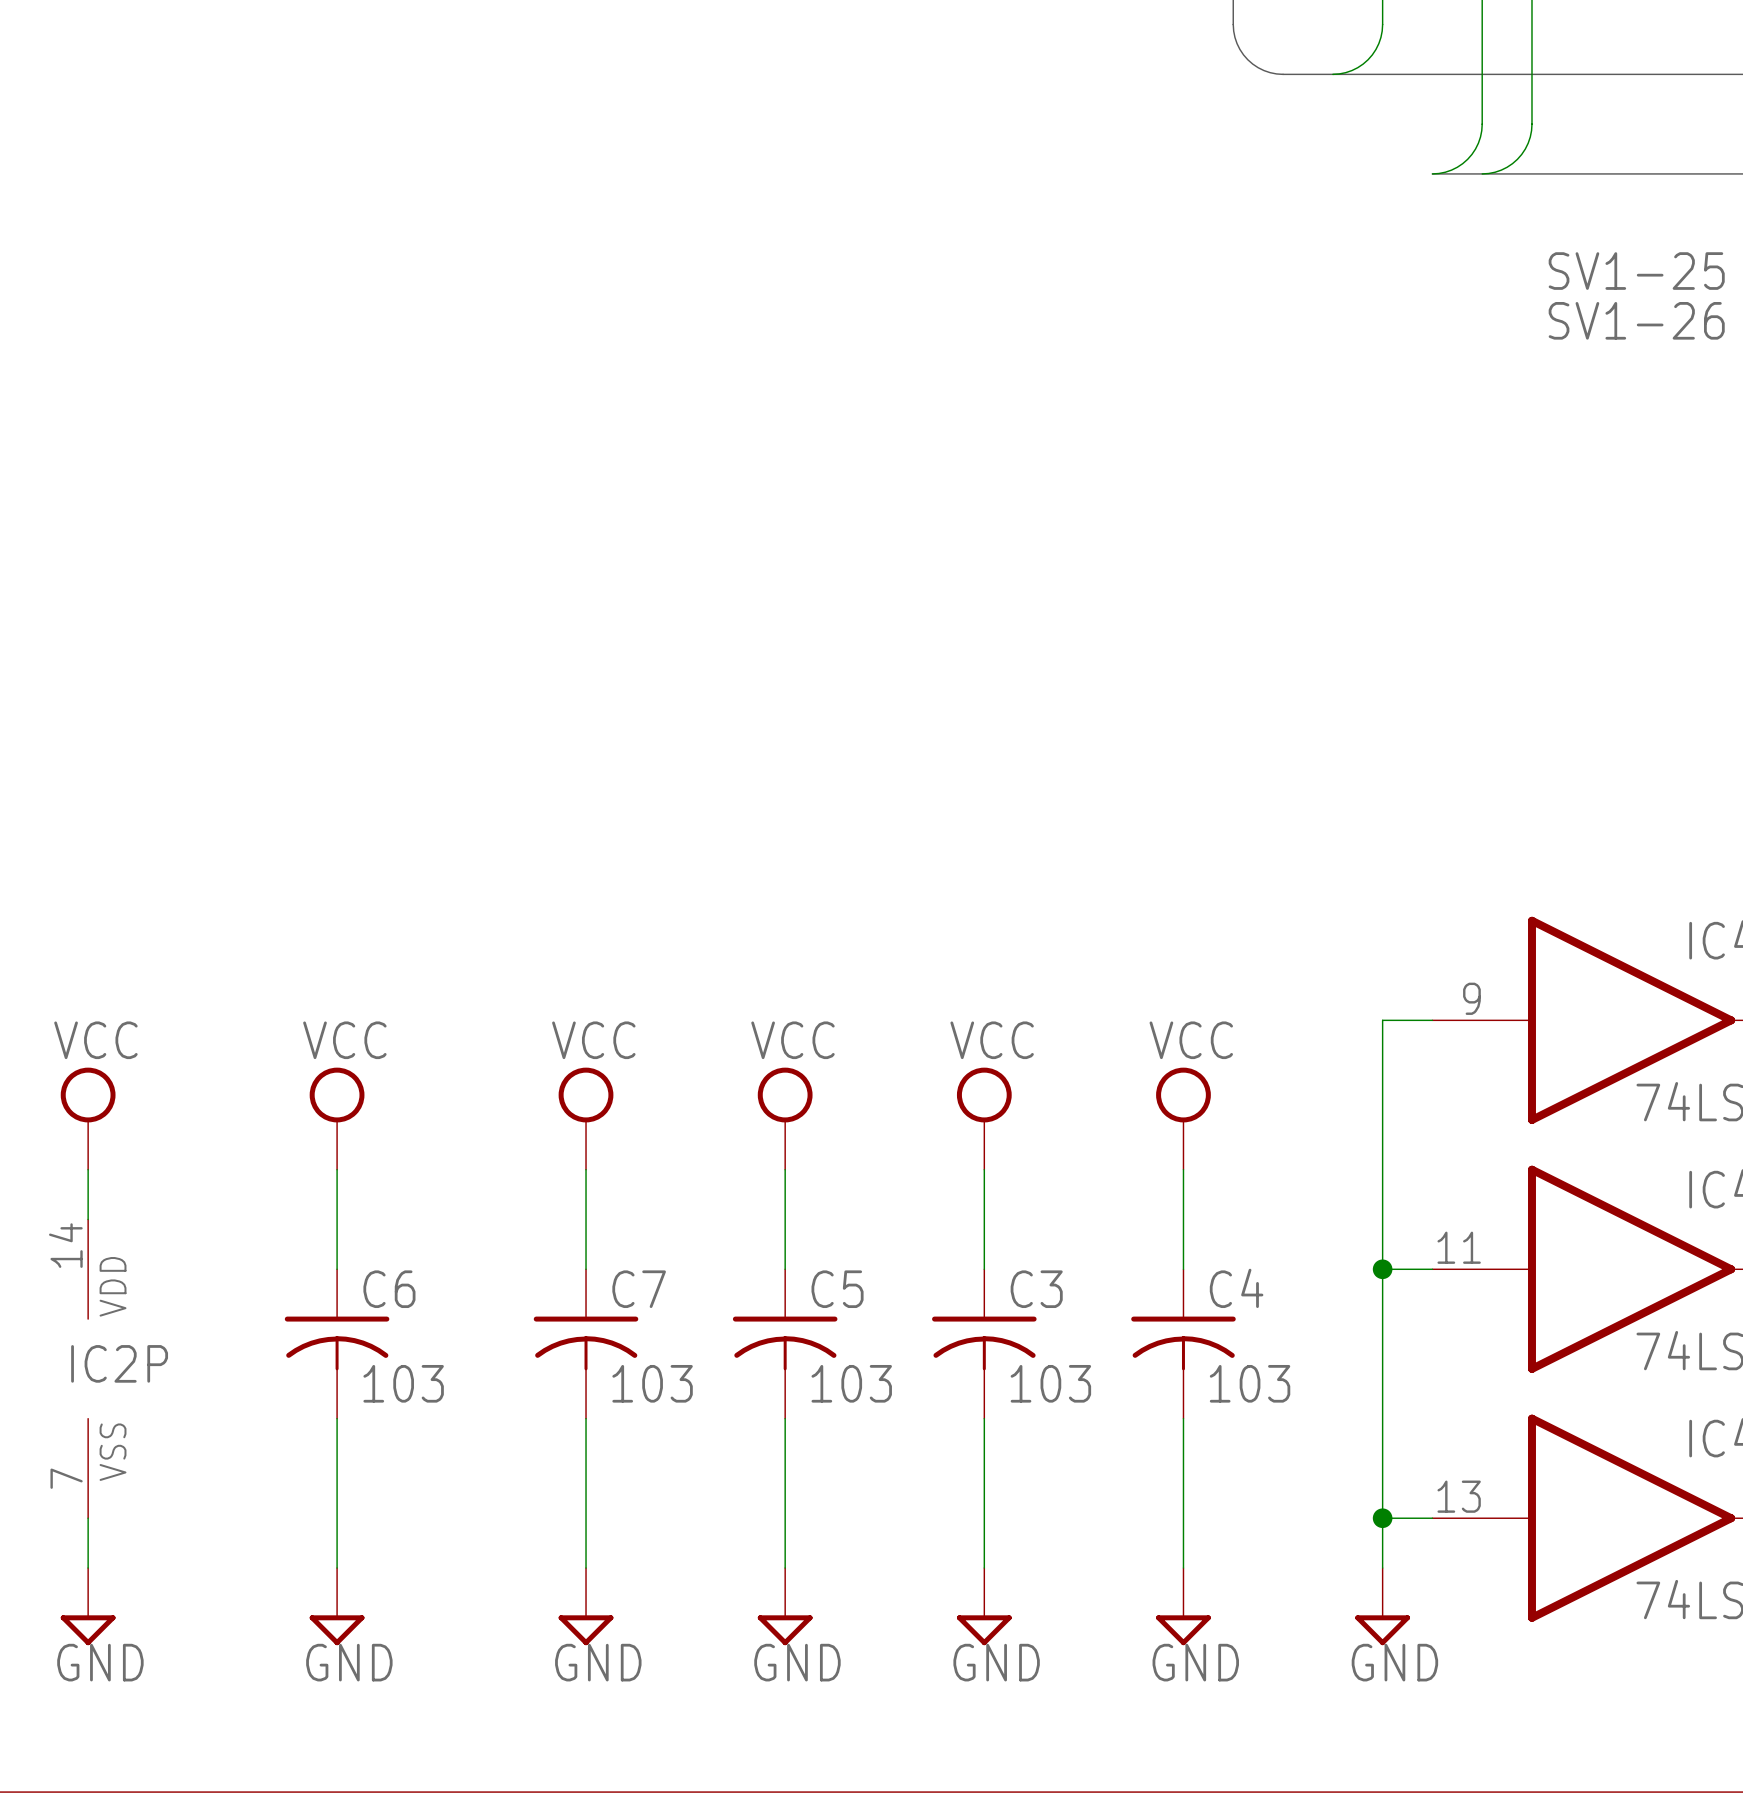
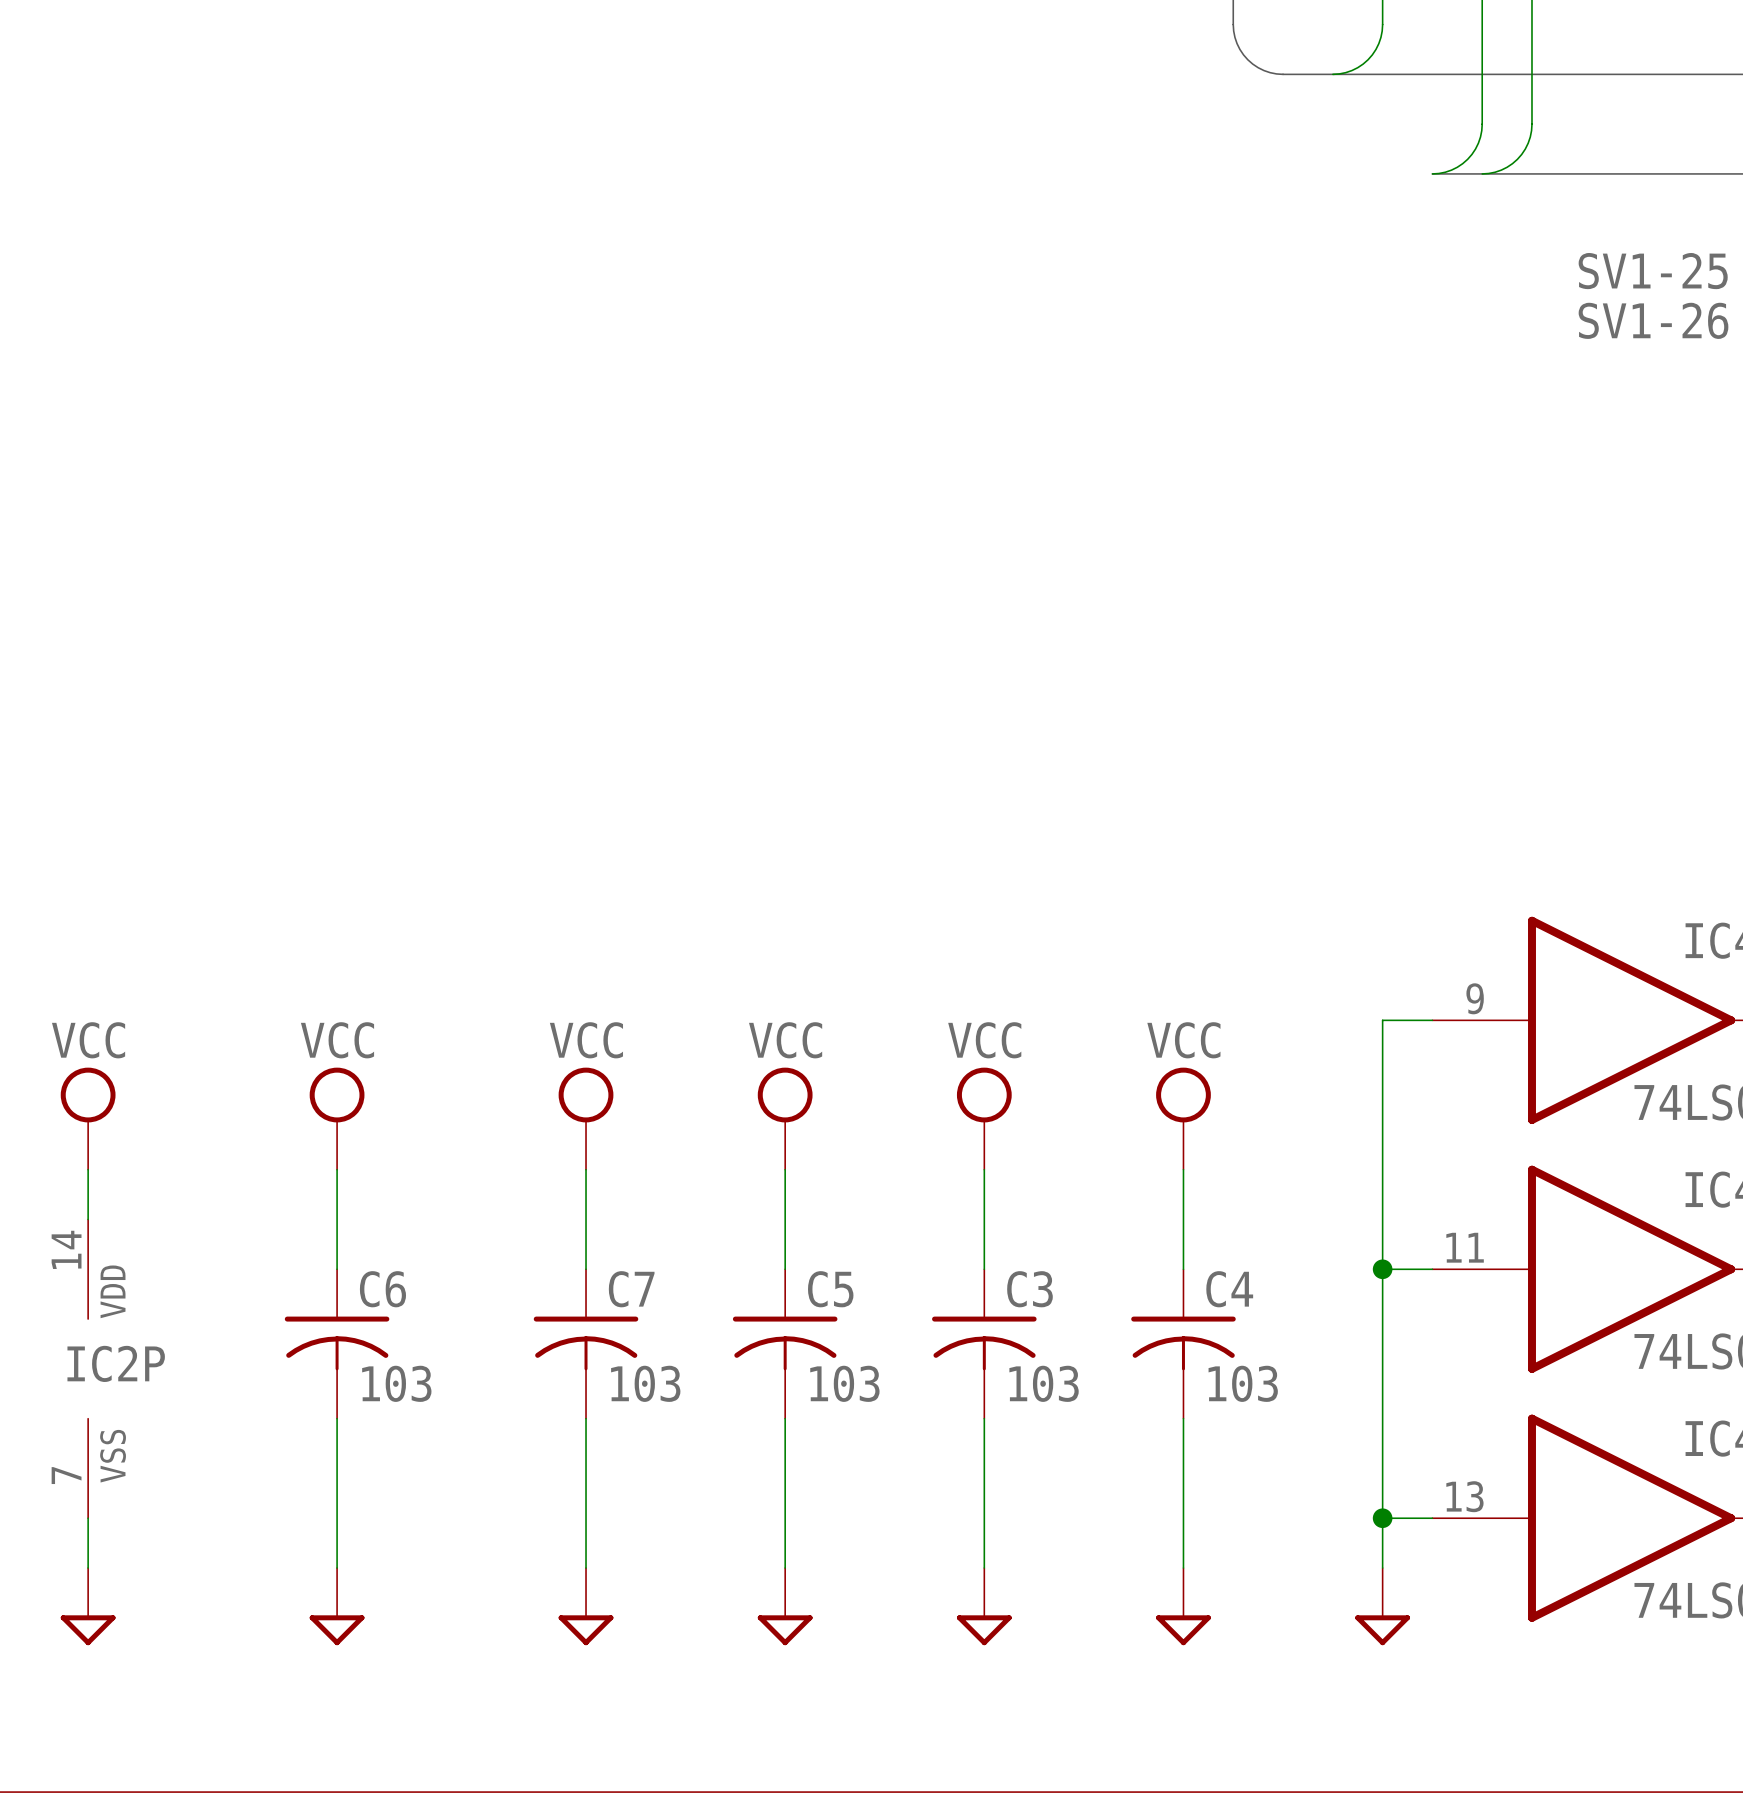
power symbol text: GND (100, 1662) -> none
power symbol text: GND (349, 1662) -> none
power symbol text: GND (598, 1662) -> none
power symbol text: GND (797, 1662) -> none
power symbol text: GND (996, 1662) -> none
power symbol text: GND (1195, 1662) -> none
power symbol text: GND (1394, 1662) -> none

